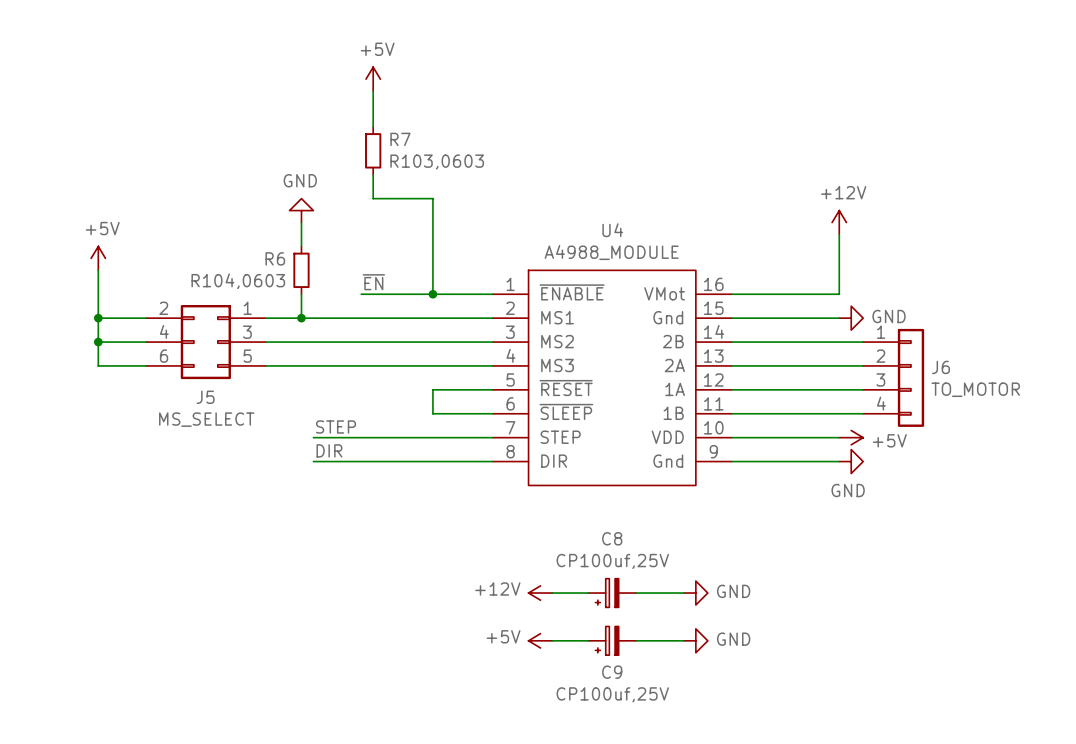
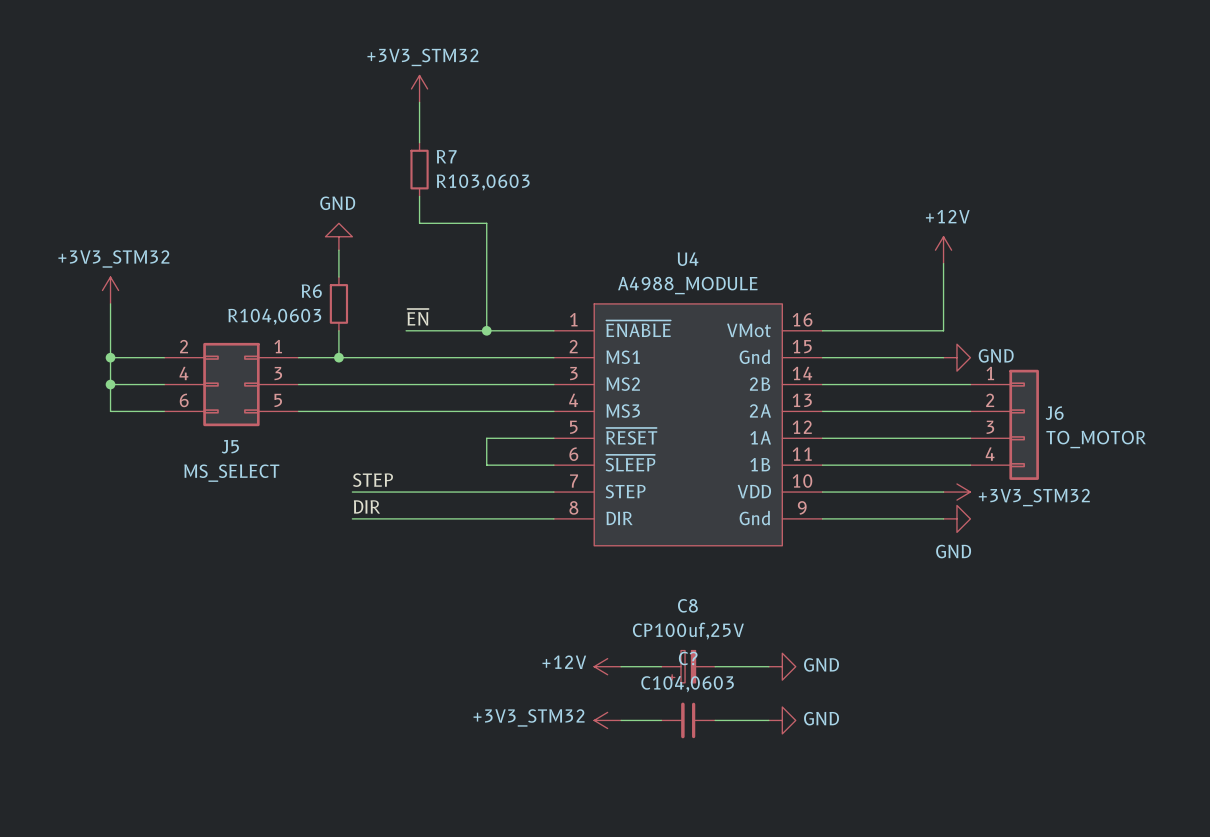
power symbol: +5V (373, 79) -> +3V3_STM32 (419, 88)
power symbol: +5V (98, 258) -> +3V3_STM32 (110, 290)
power symbol: +5V (851, 437) -> +3V3_STM32 (956, 492)
power symbol: +5V (540, 640) -> +3V3_STM32 (607, 720)
C9: CP100uf,25V (612, 640) -> none
C?: none -> C104,0603 (688, 720)

